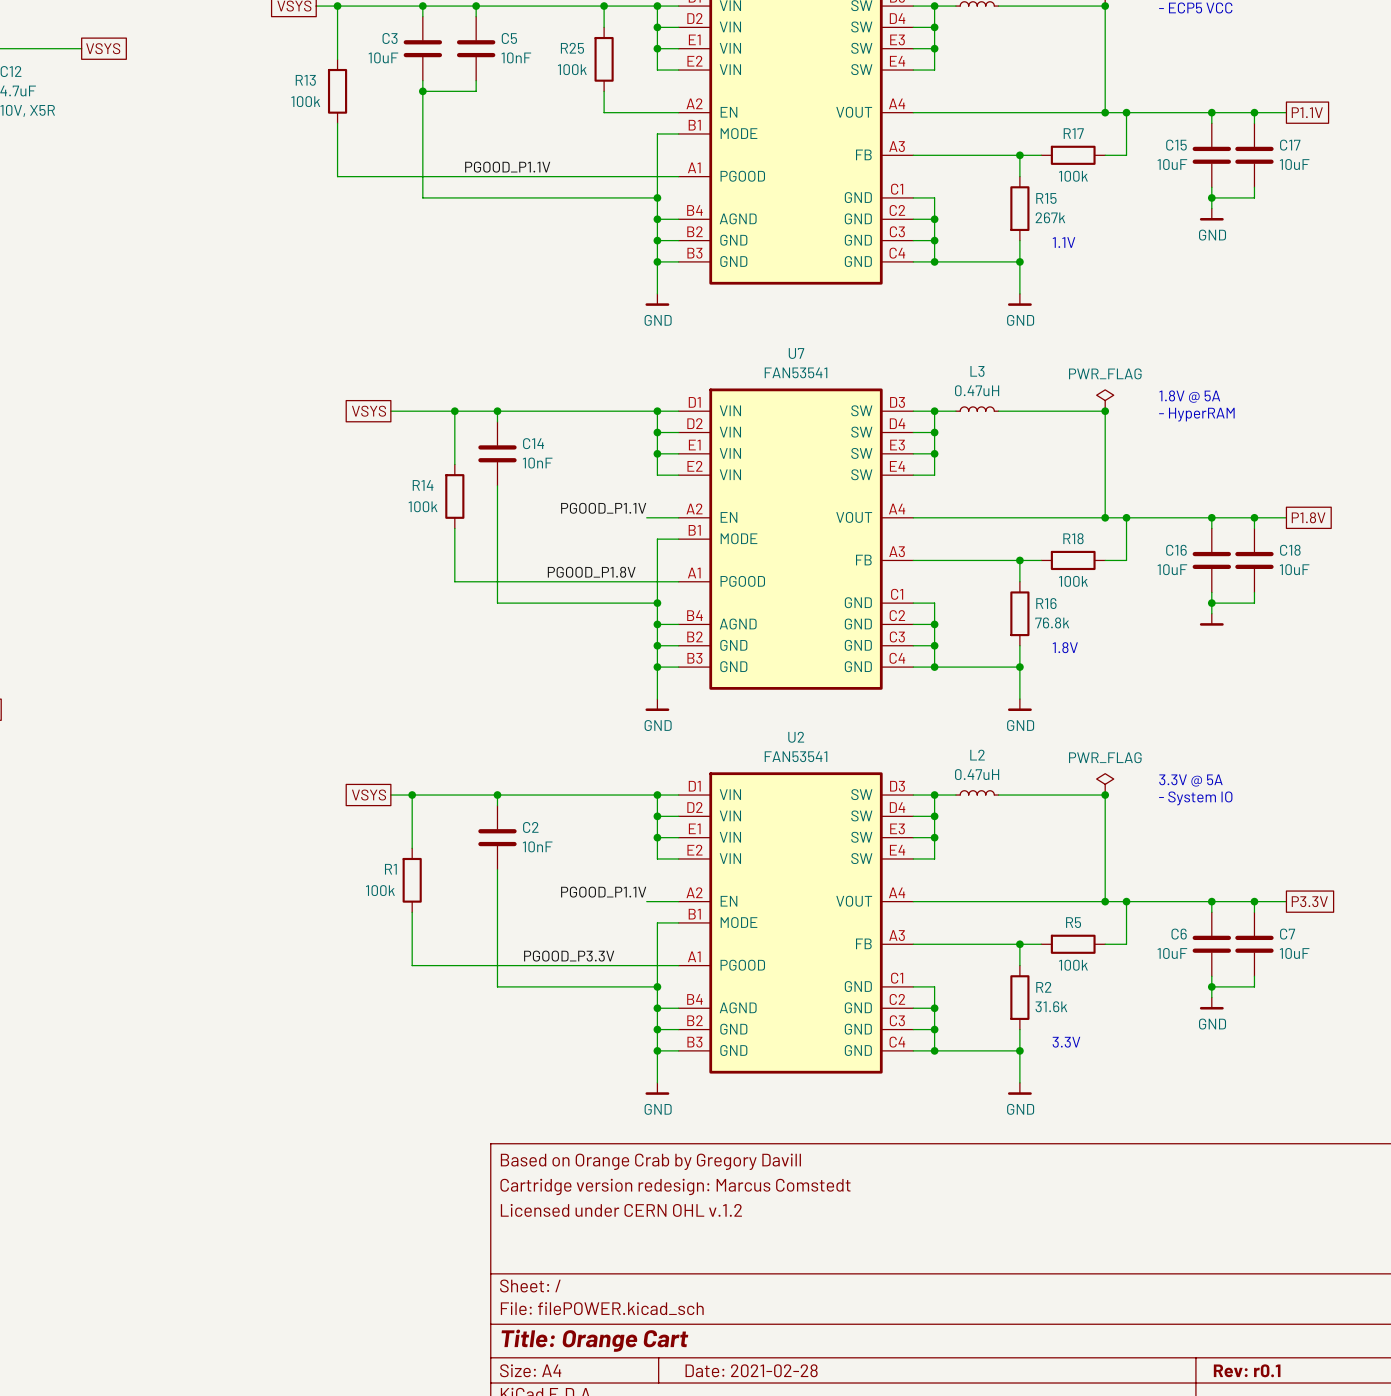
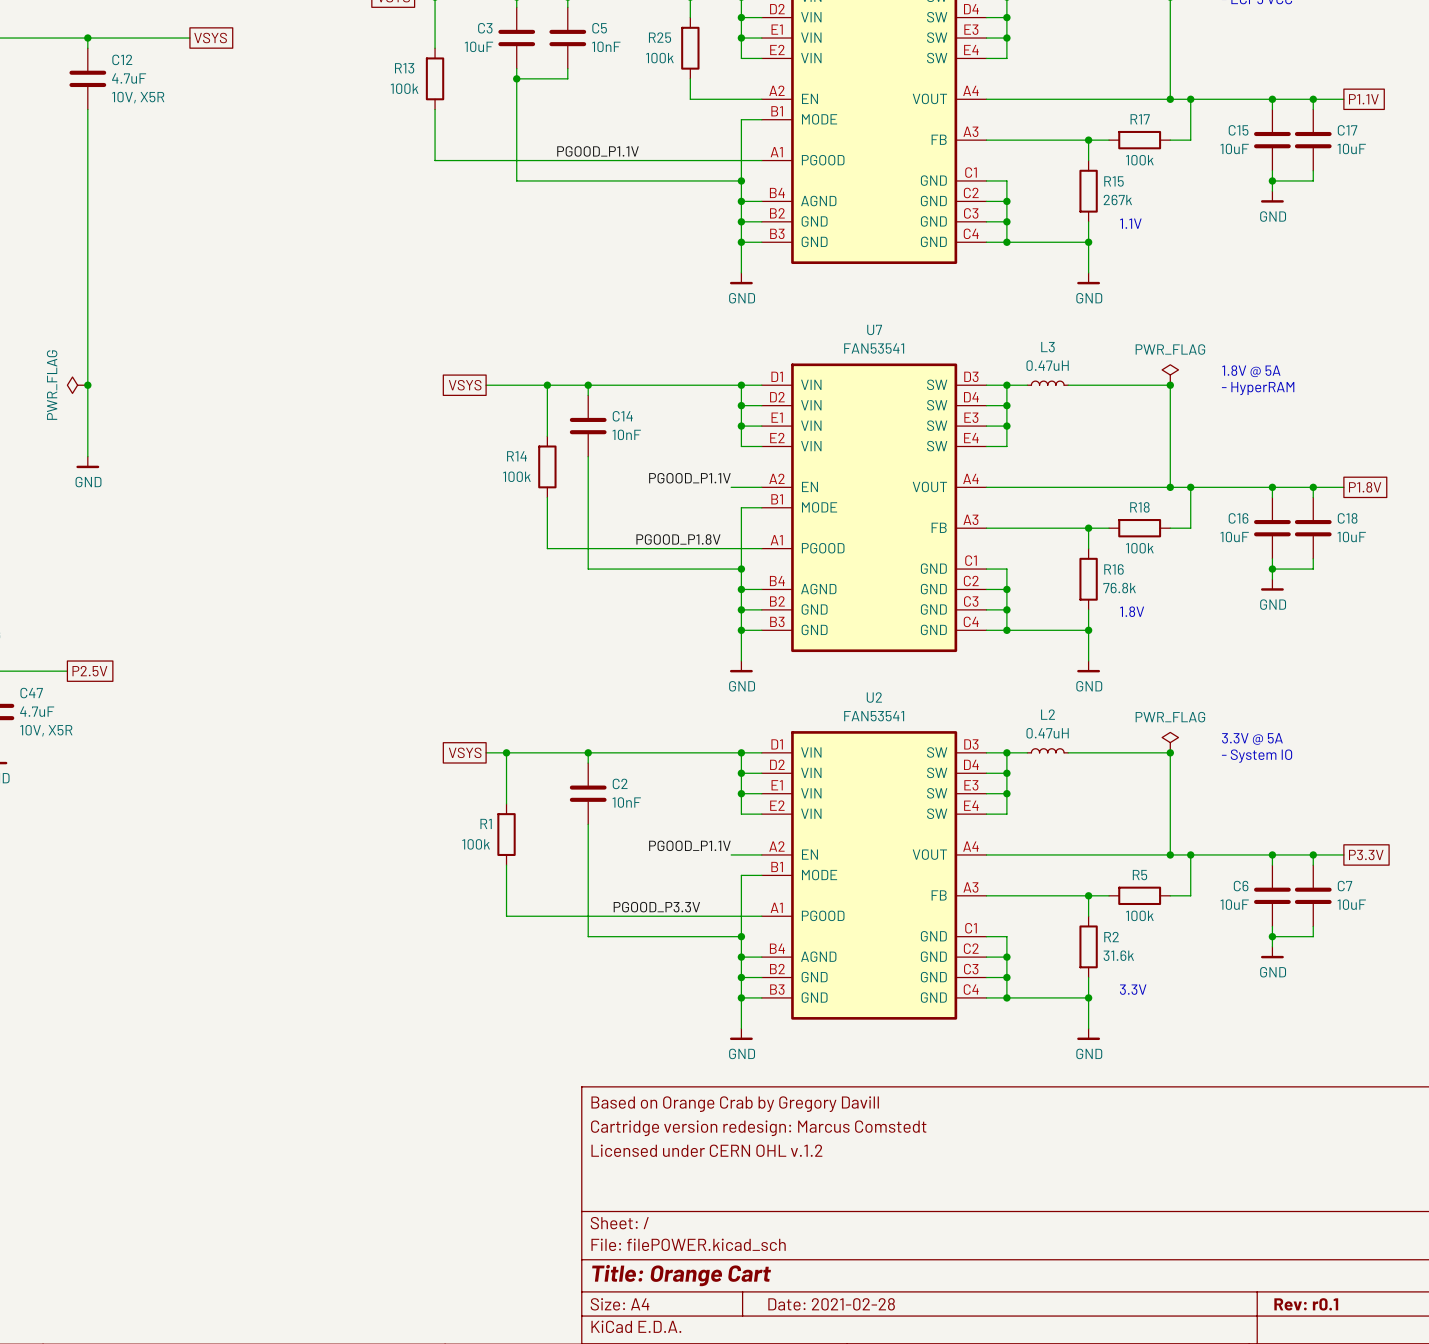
power symbol text: none -> GND (1273, 604)

